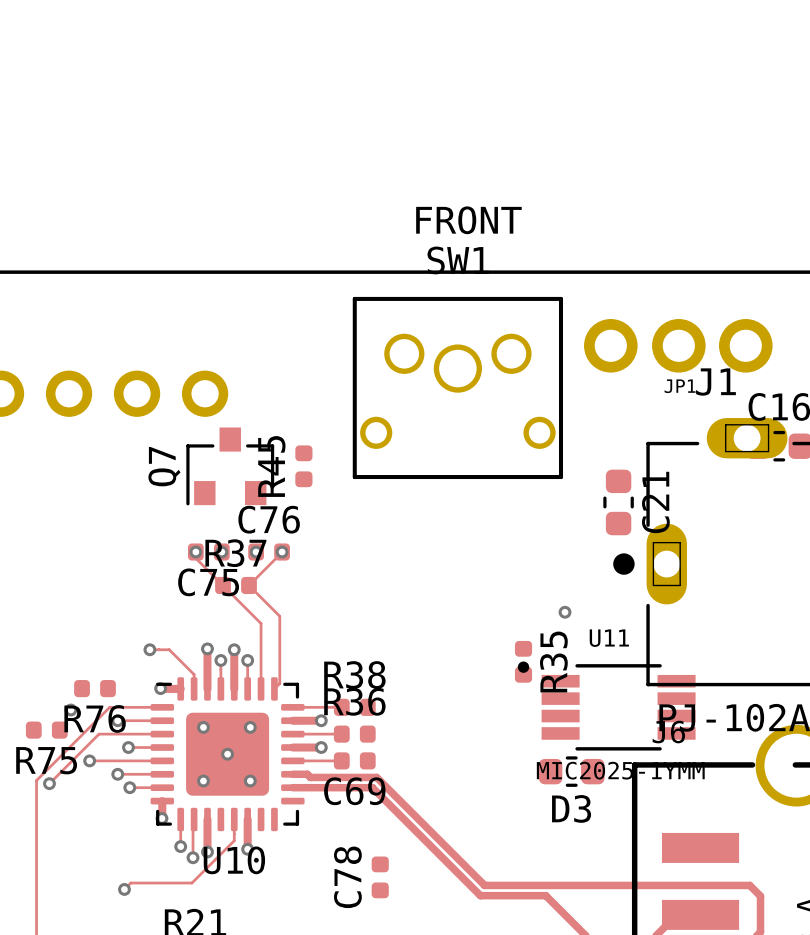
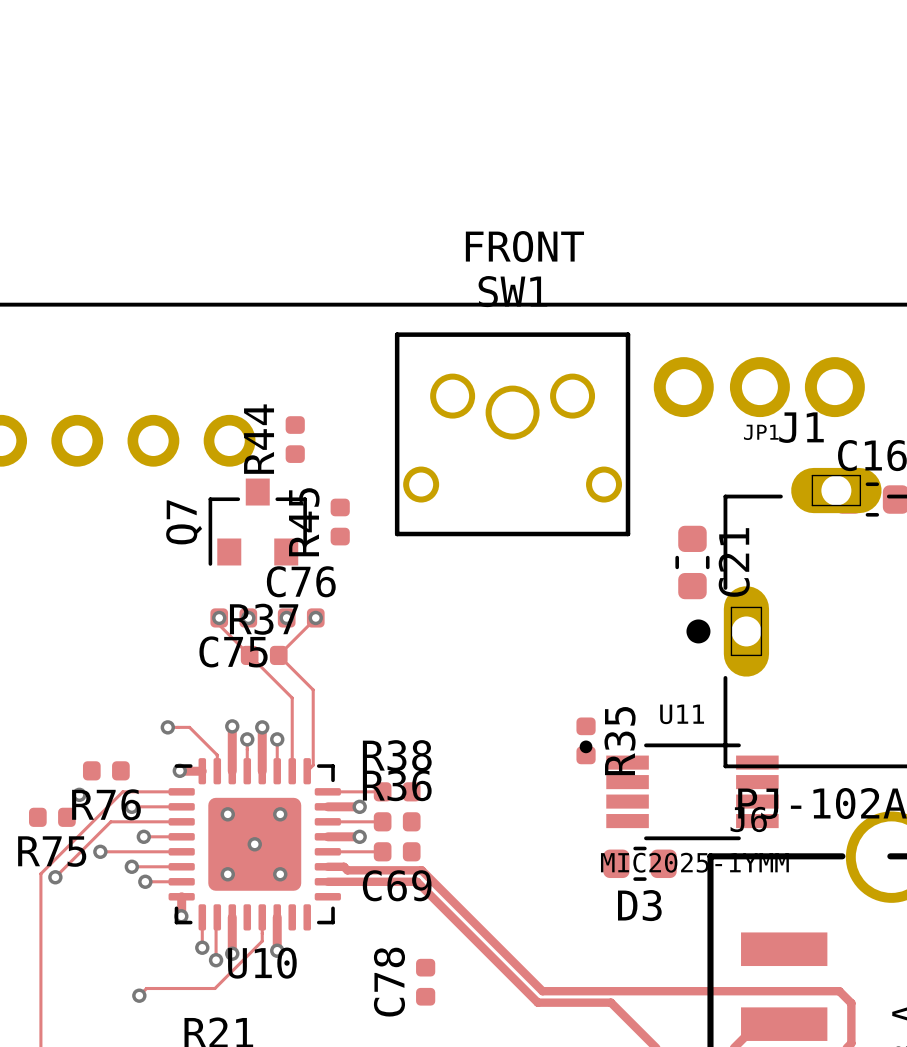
R44: none -> (295, 439)
via: (565, 612) -> none

